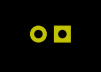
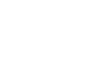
part: (50, 34) -> none

